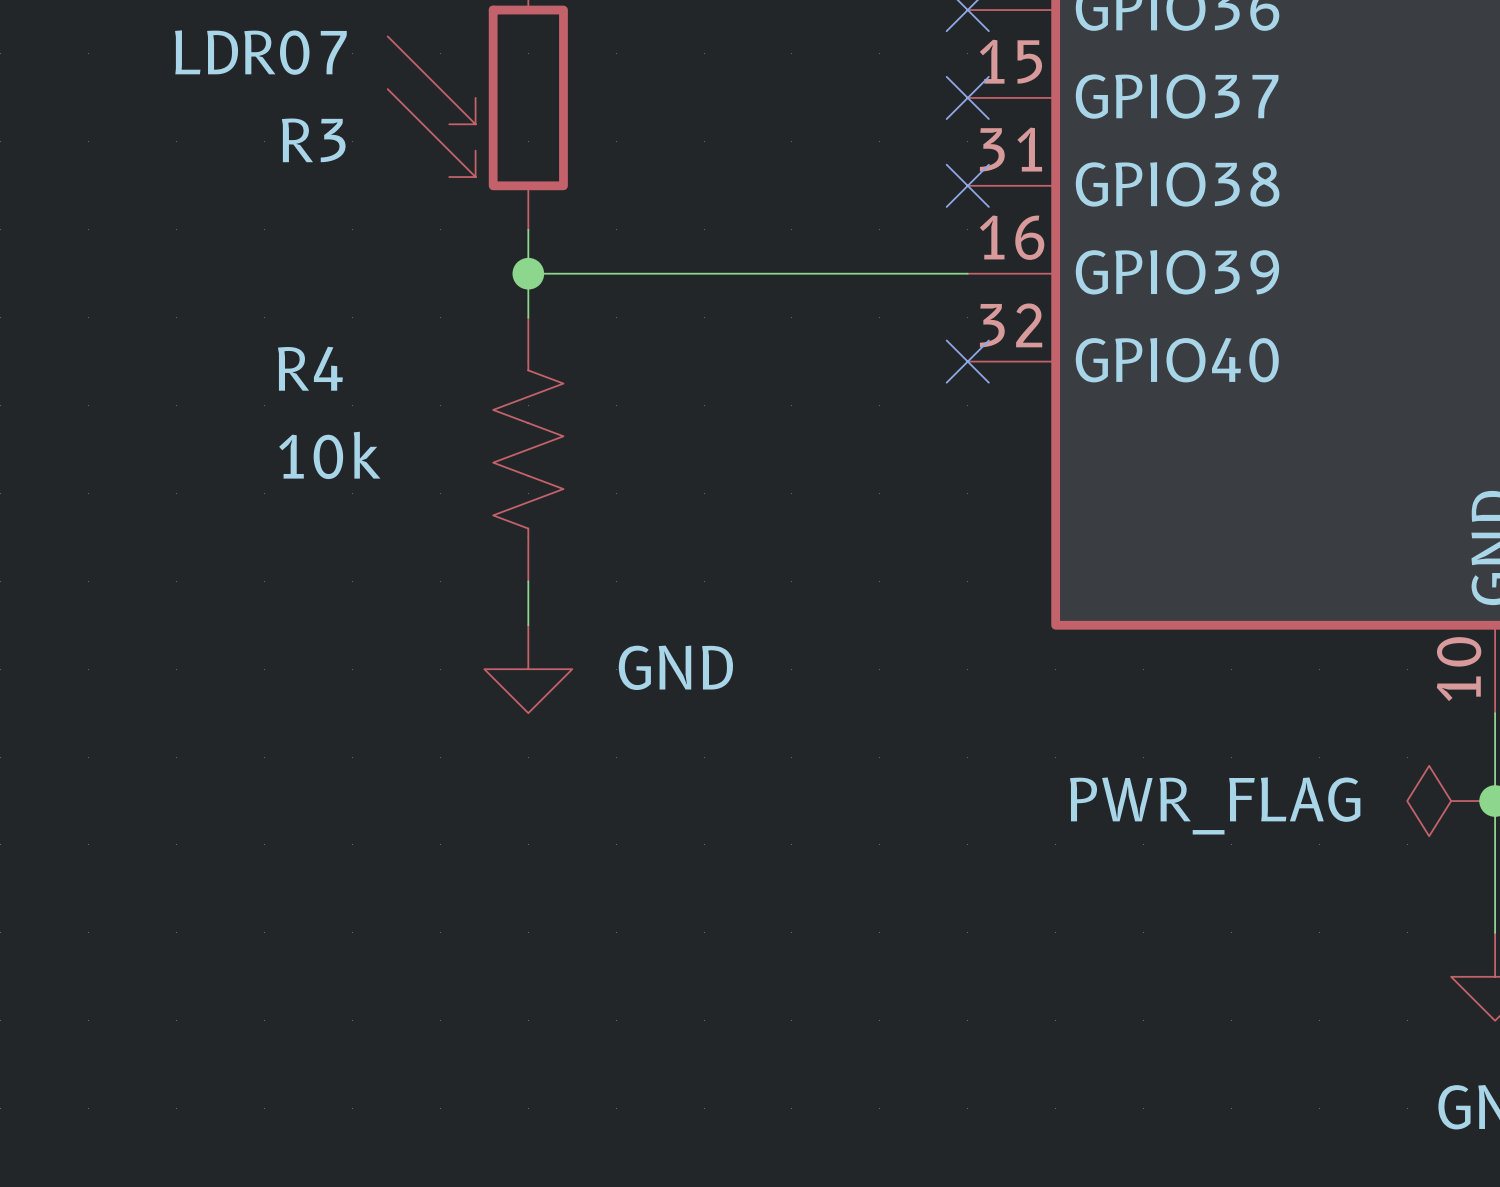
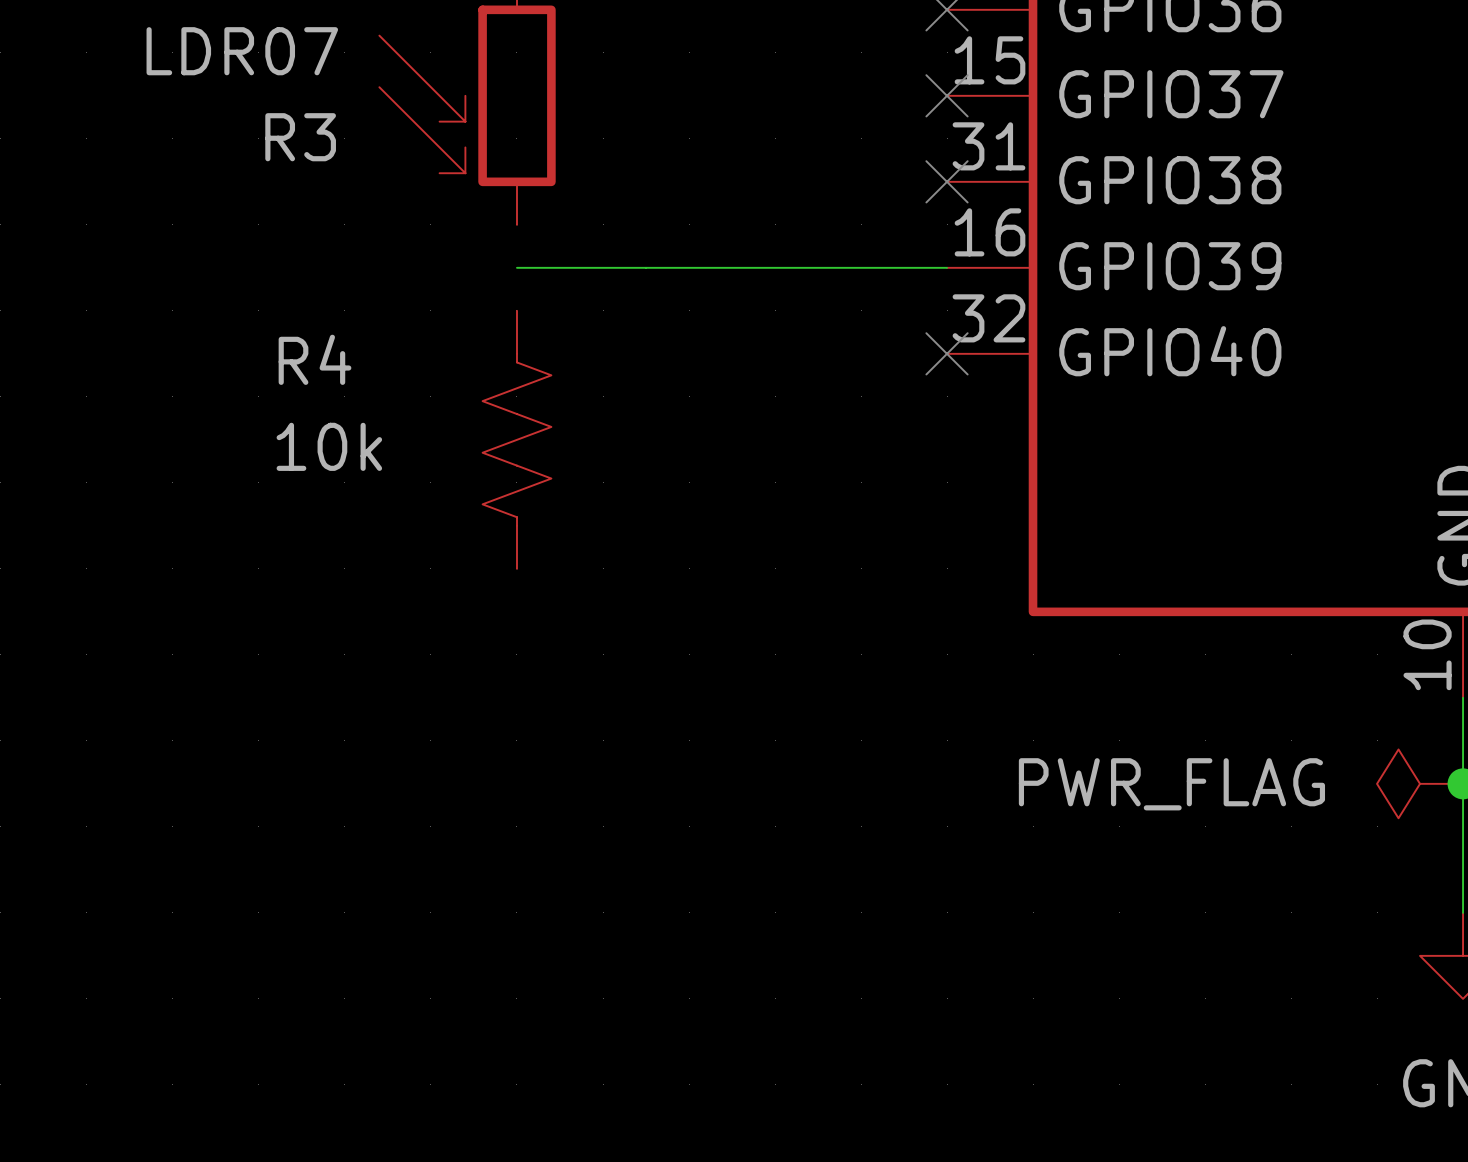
wire: (528, 229) (528, 317) -> none
junction: (528, 273) -> none
wire: (528, 581) (528, 625) -> none
power symbol: GND (528, 669) -> none

